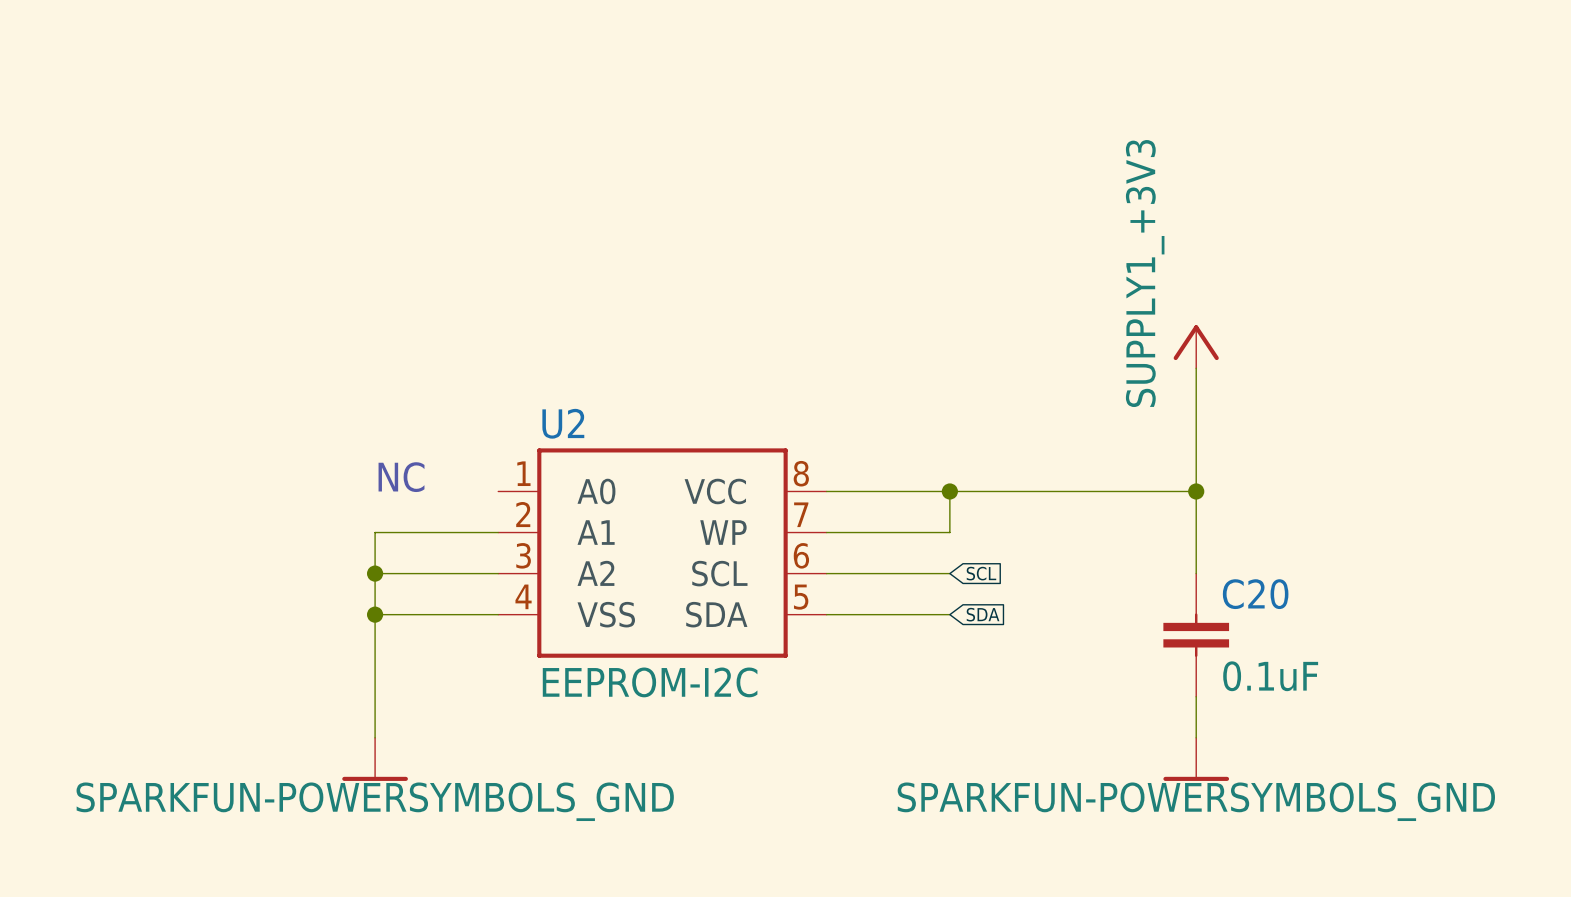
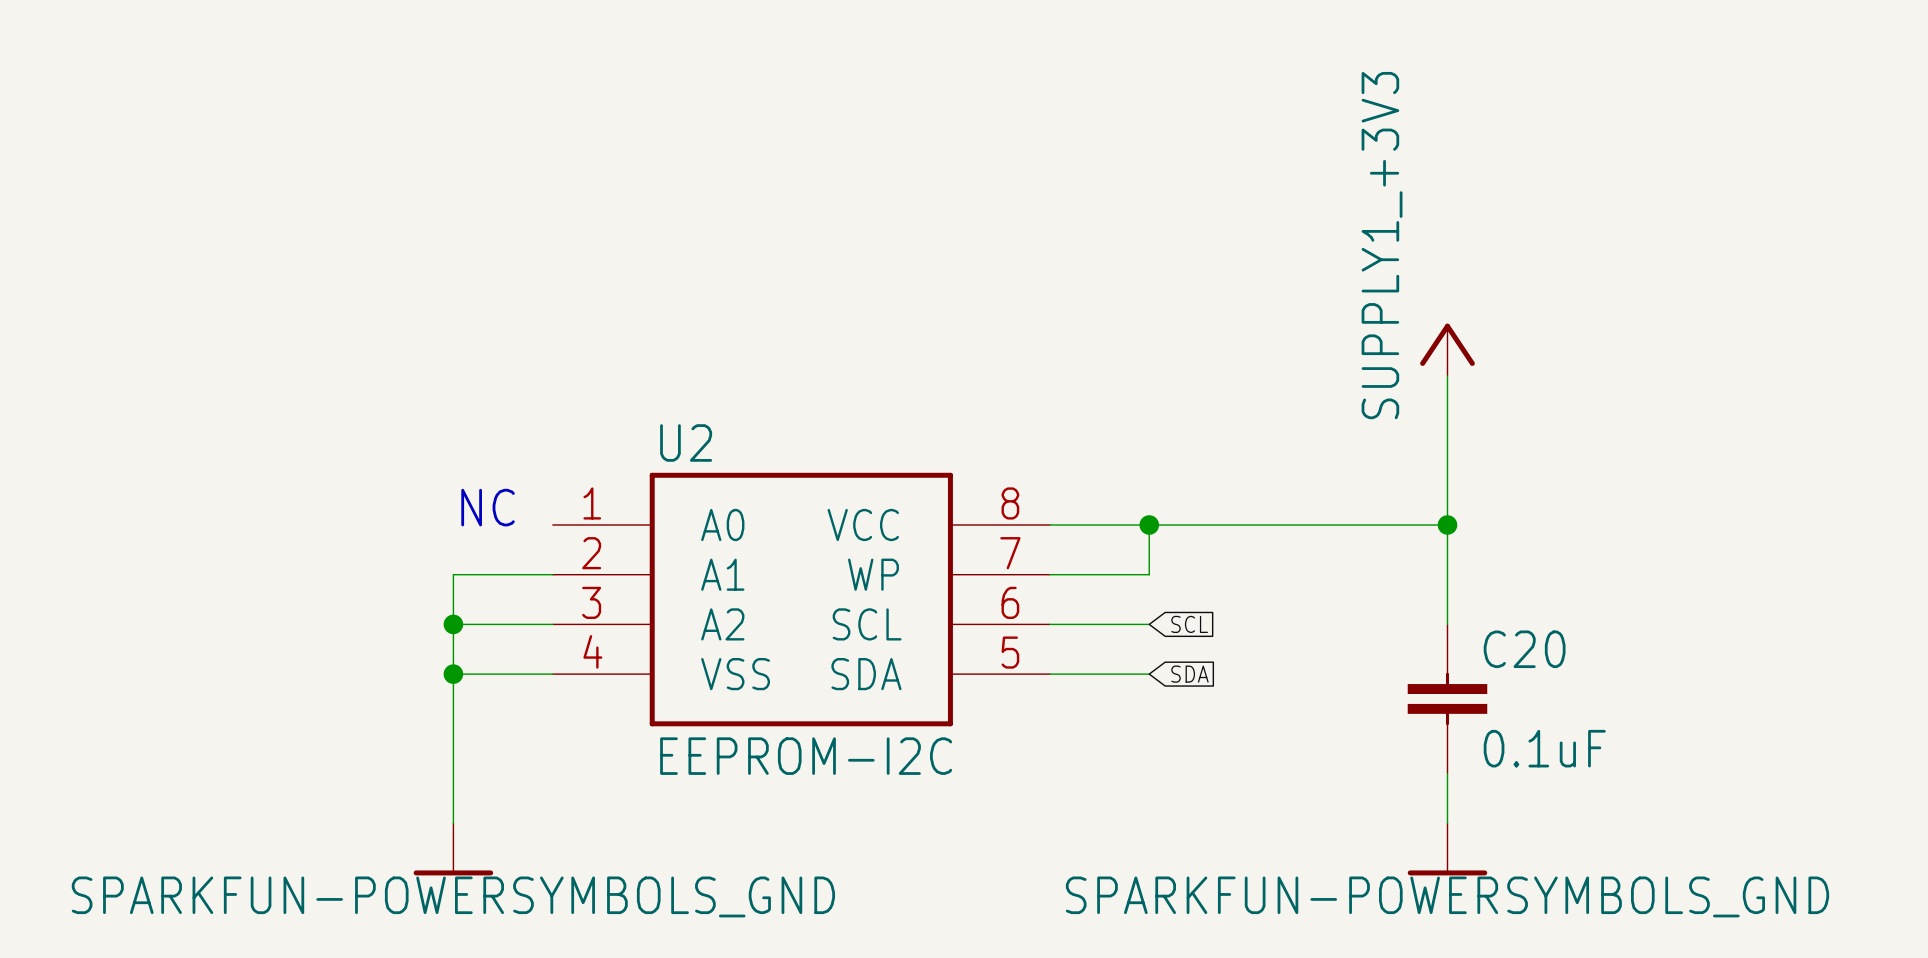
U2 symbol: [498, 448, 827, 658] -> [552, 472, 1050, 727]

